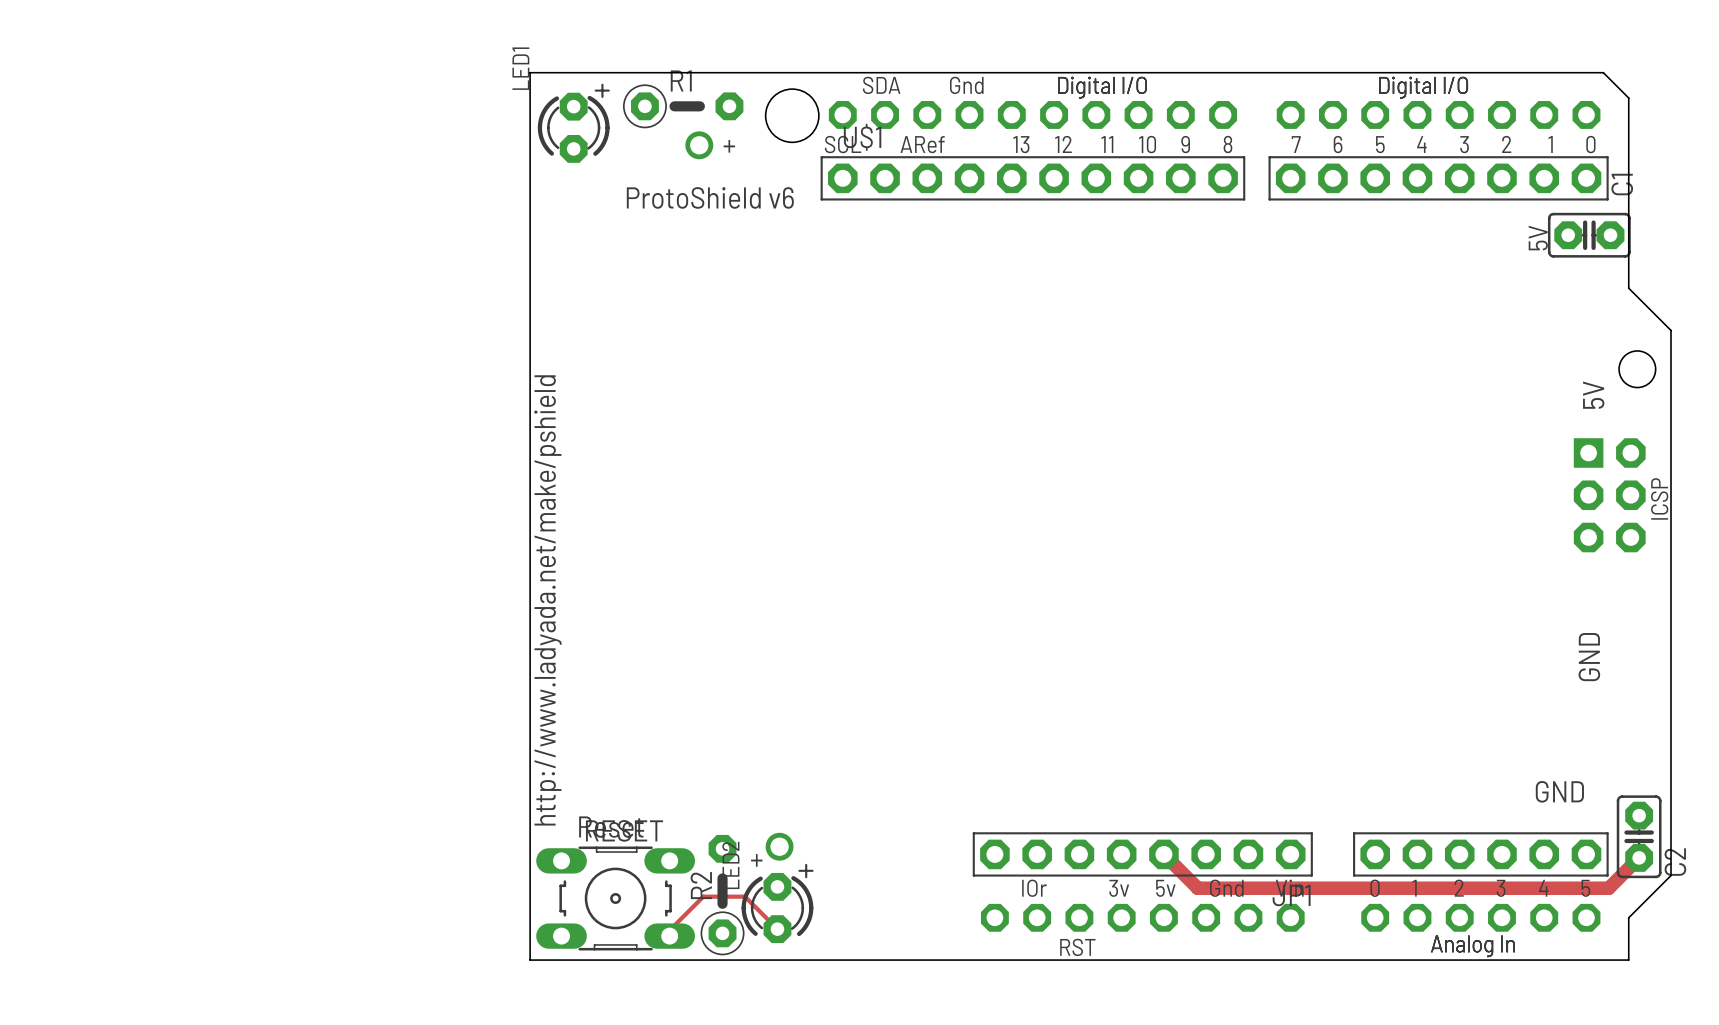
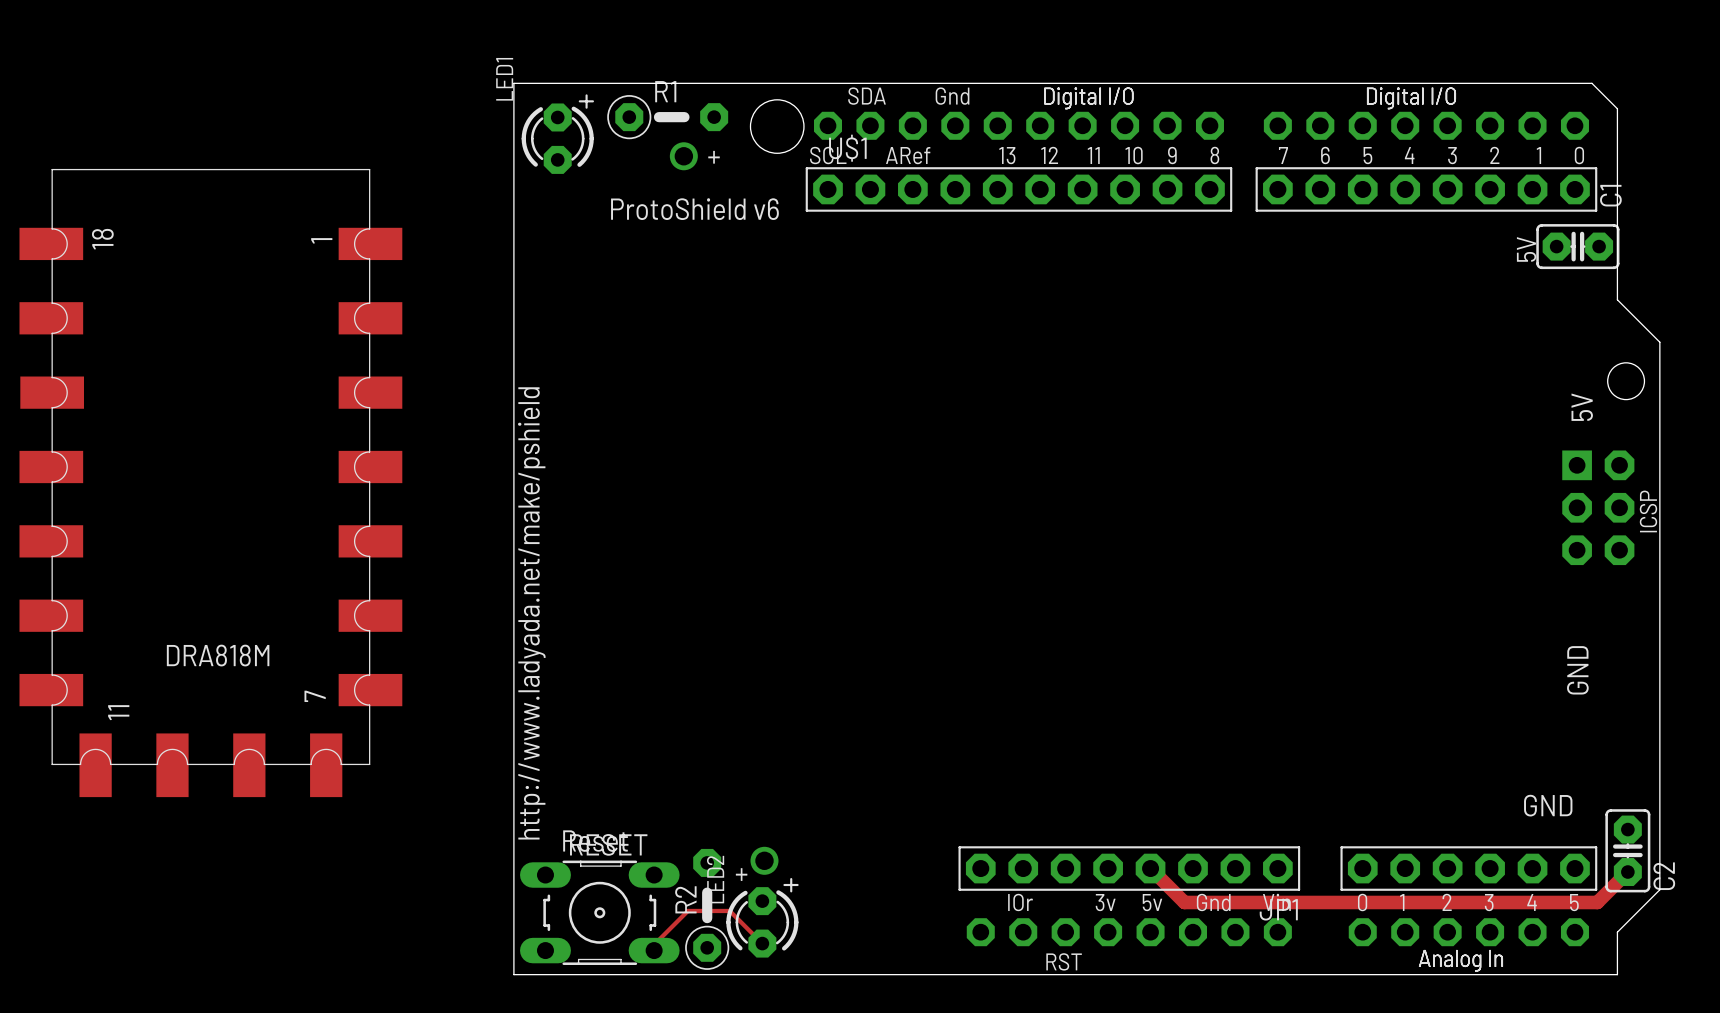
part: none -> (210, 483)

